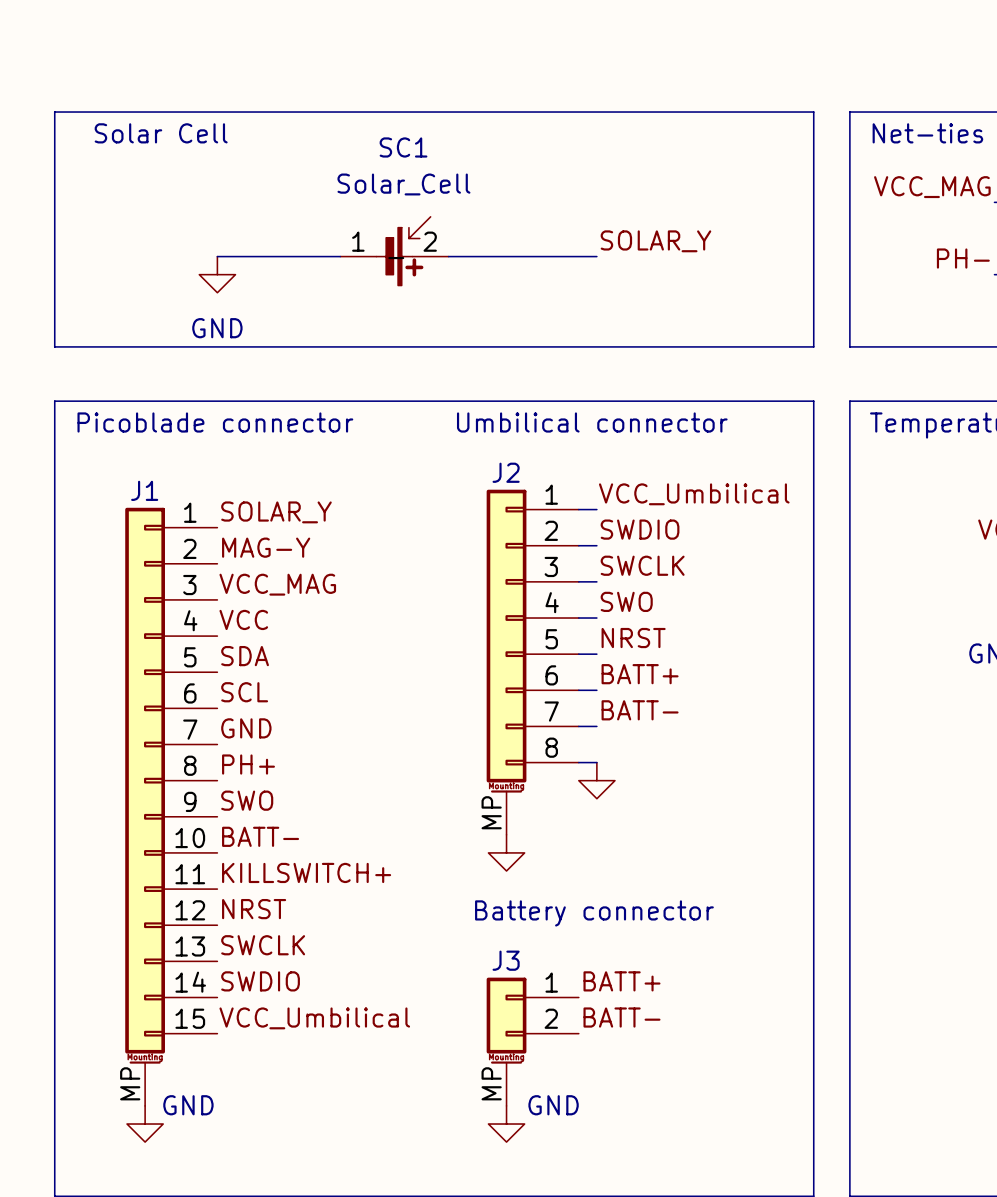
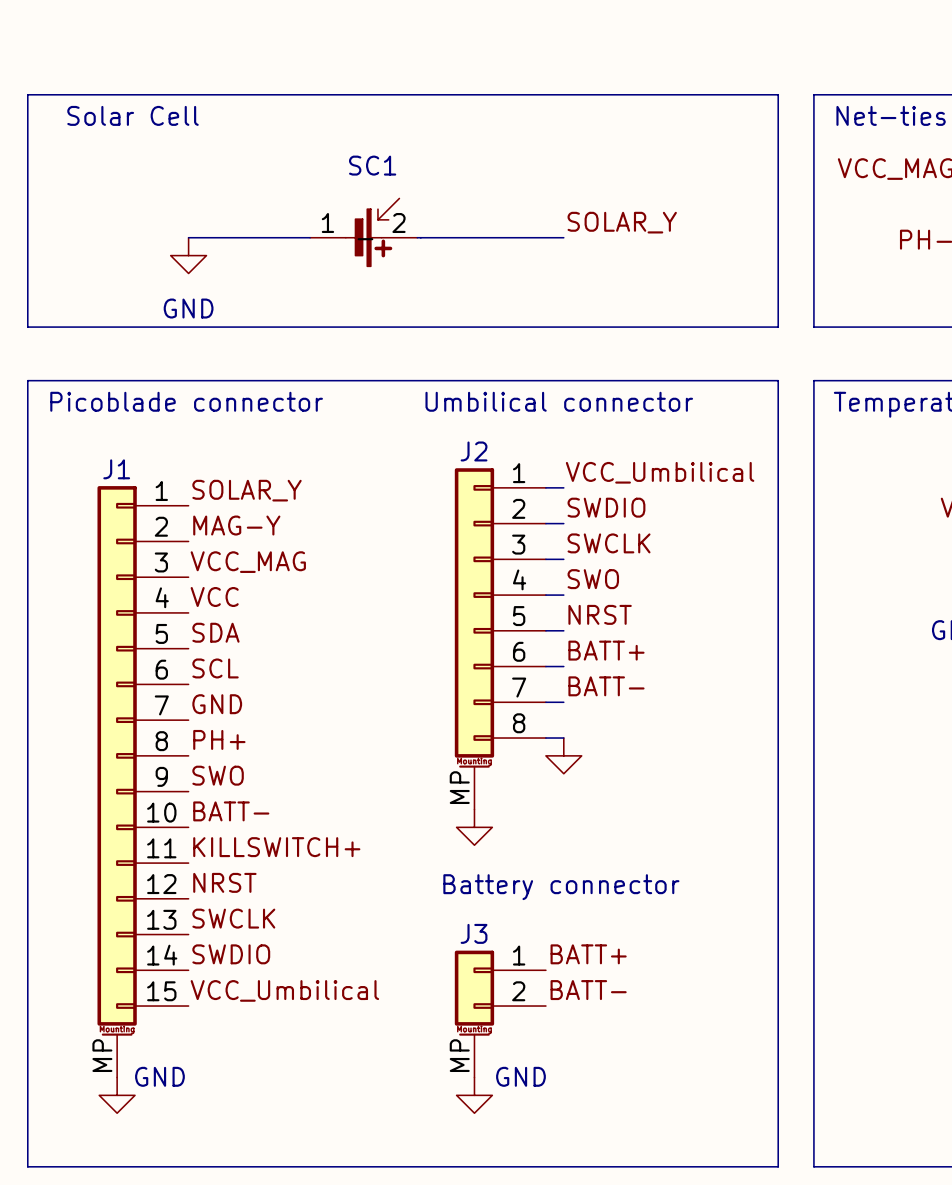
SC1 name position: SC1 (403, 147) -> SC1 (372, 165)
SC1 value: Solar_Cell (403, 184) -> none

